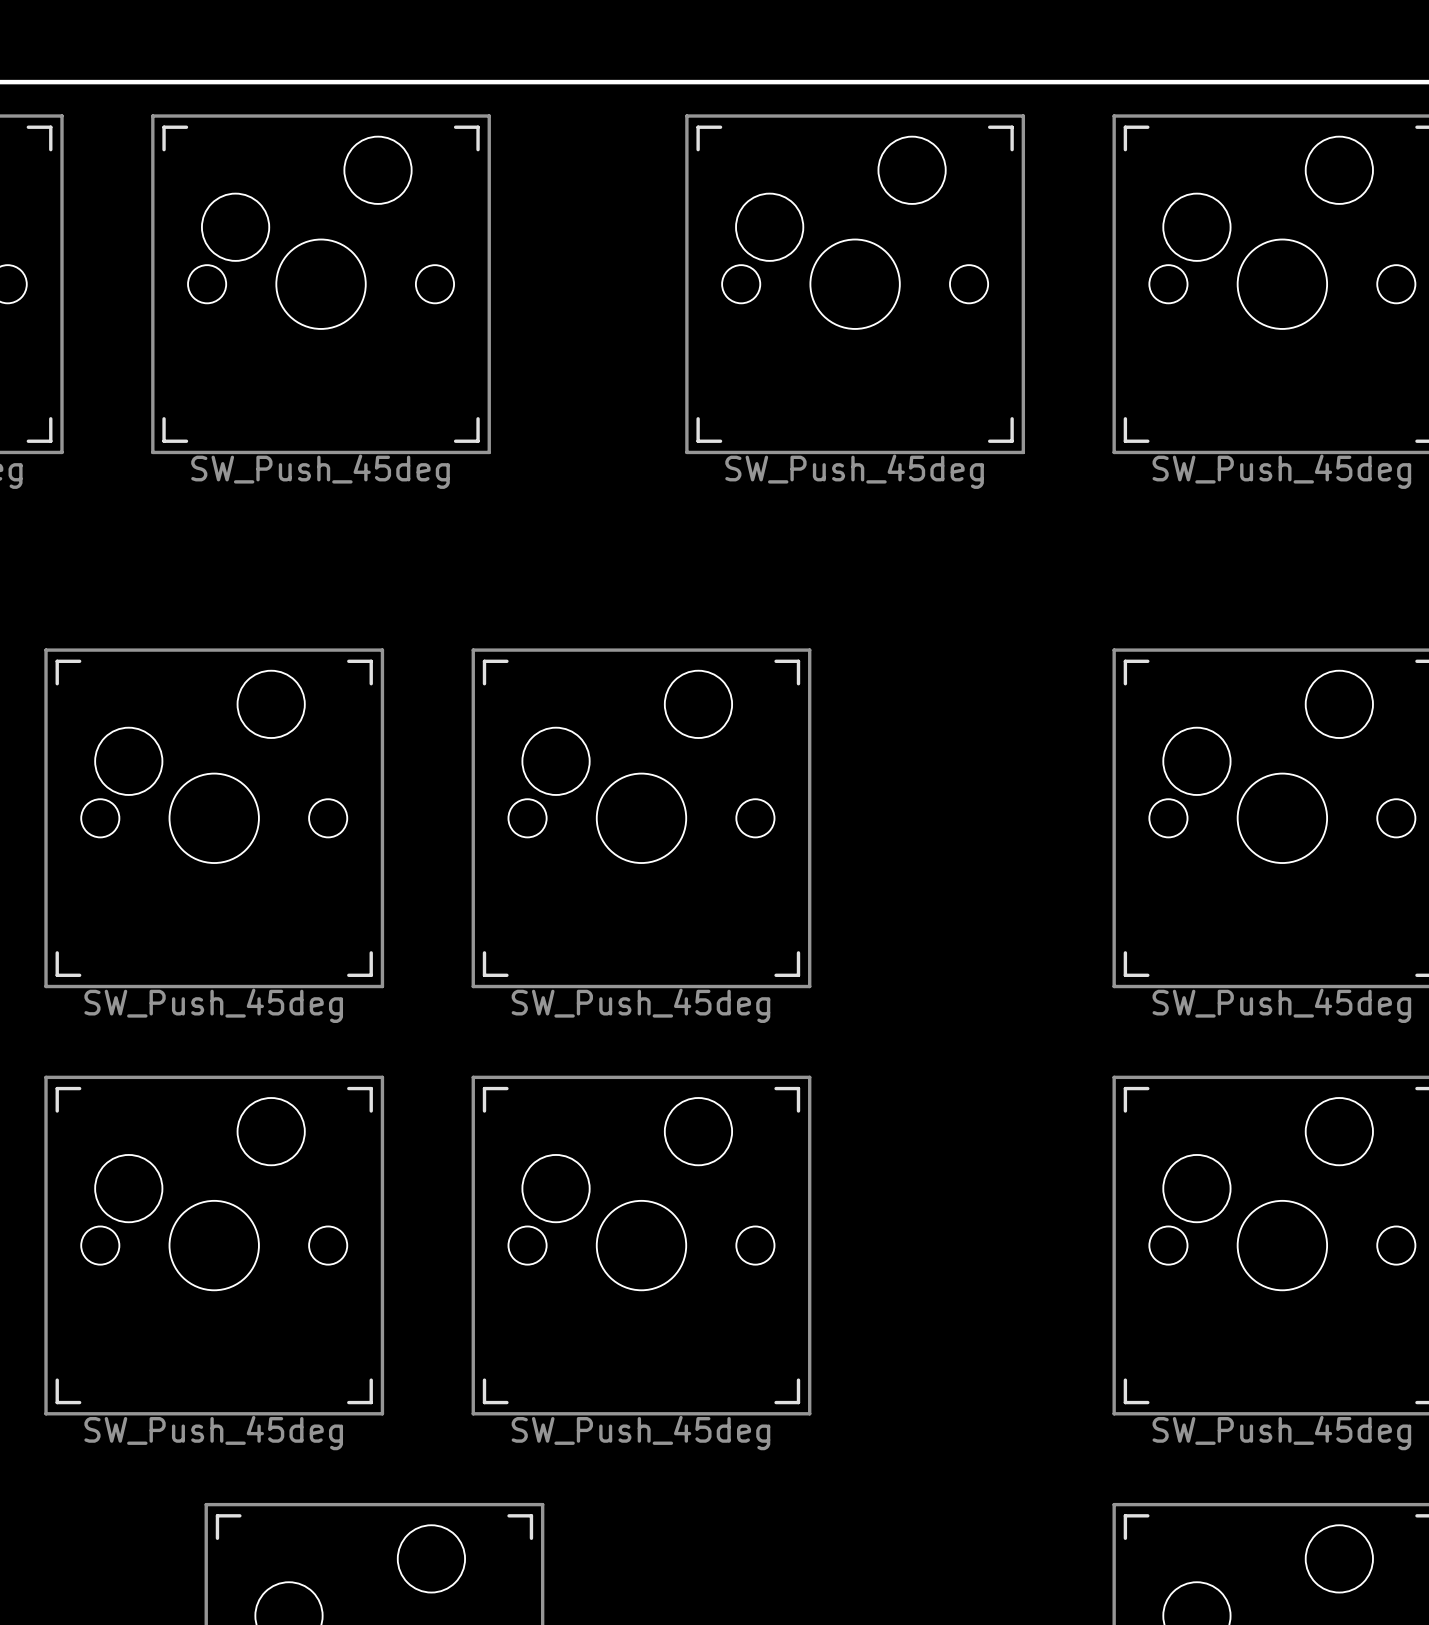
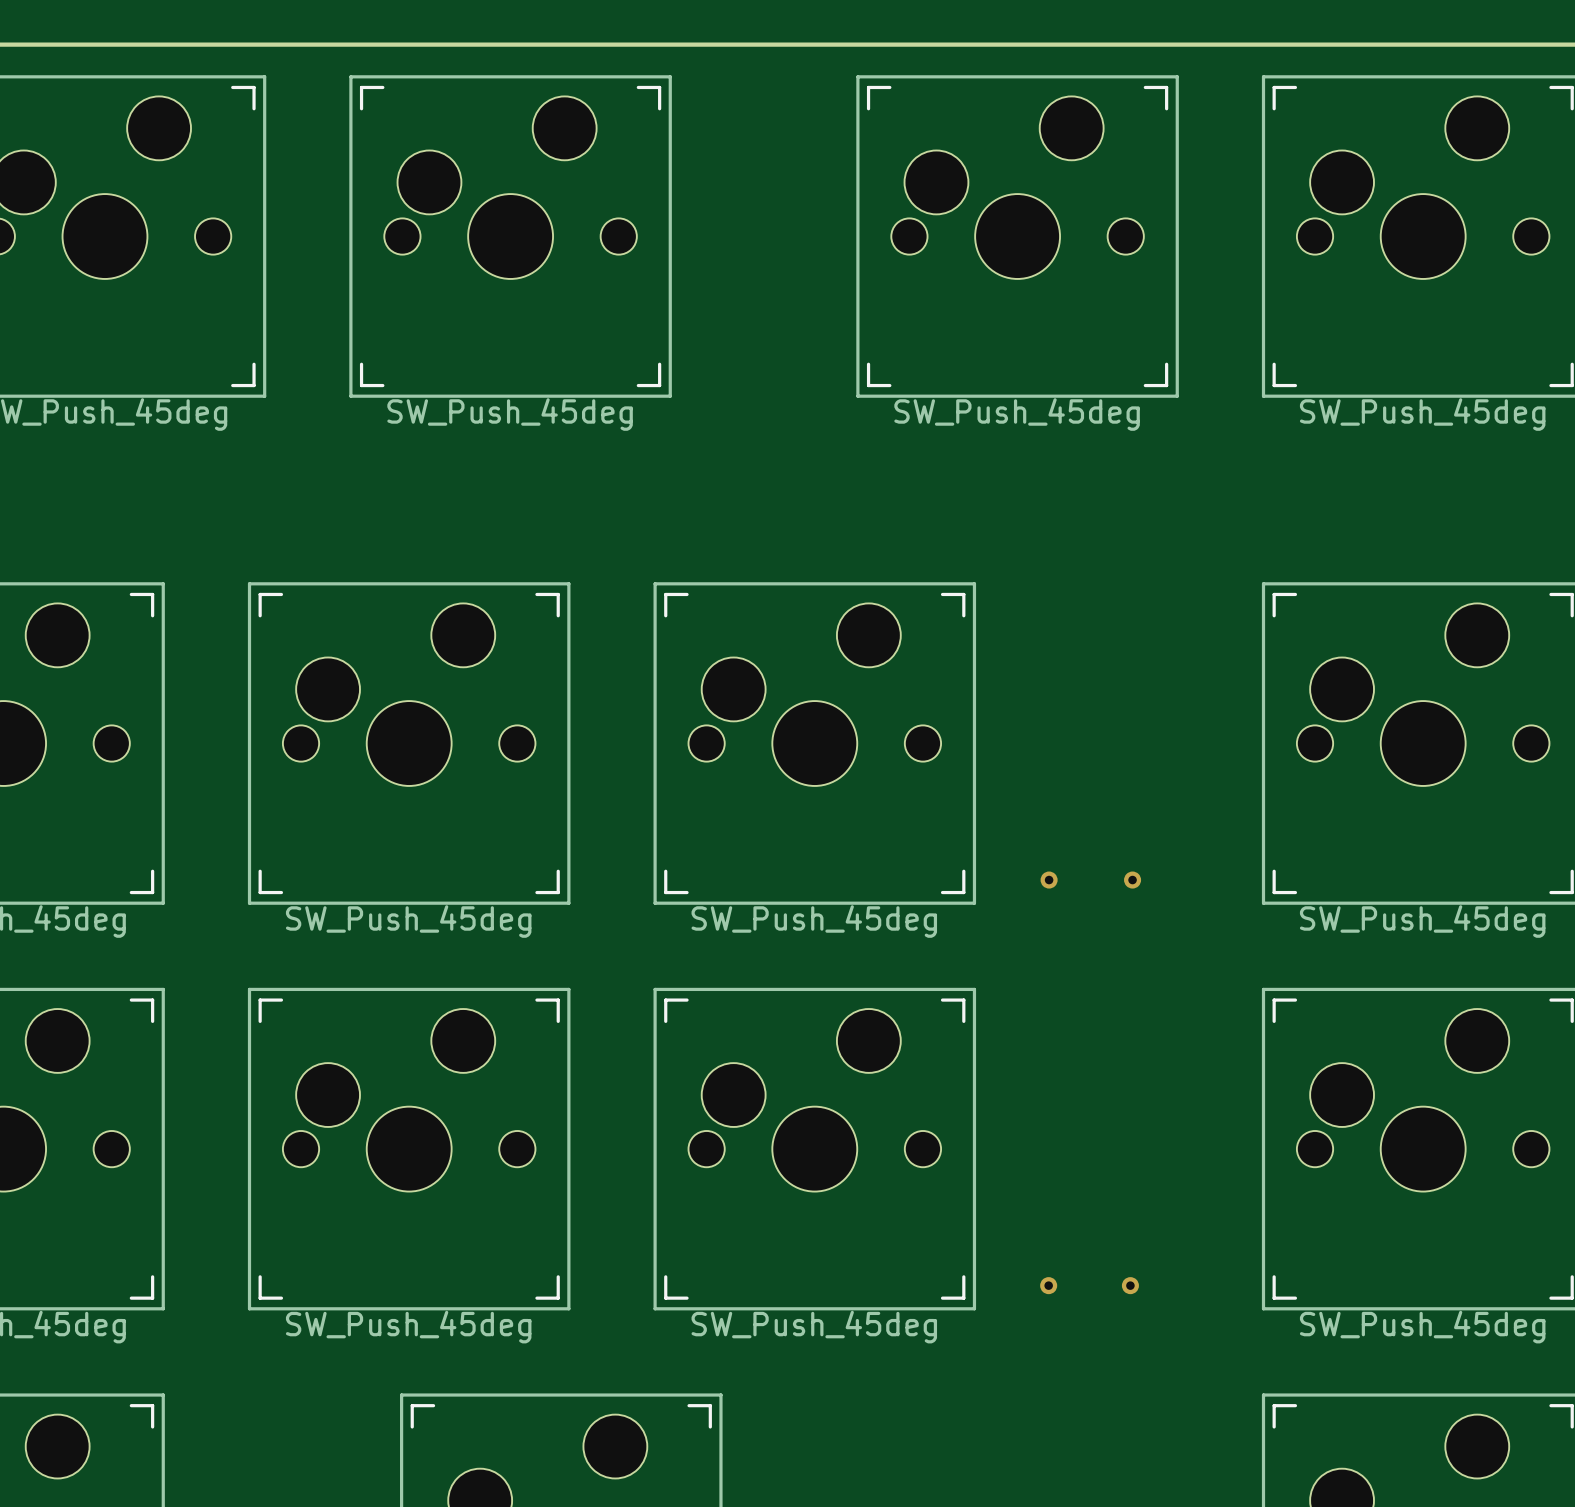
via: none -> (1049, 880)
via: none -> (1132, 880)
via: none -> (1048, 1285)
via: none -> (1130, 1285)

